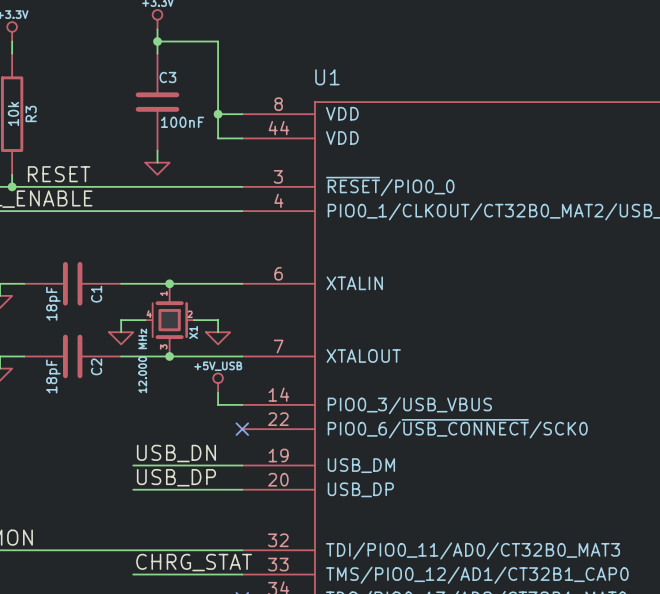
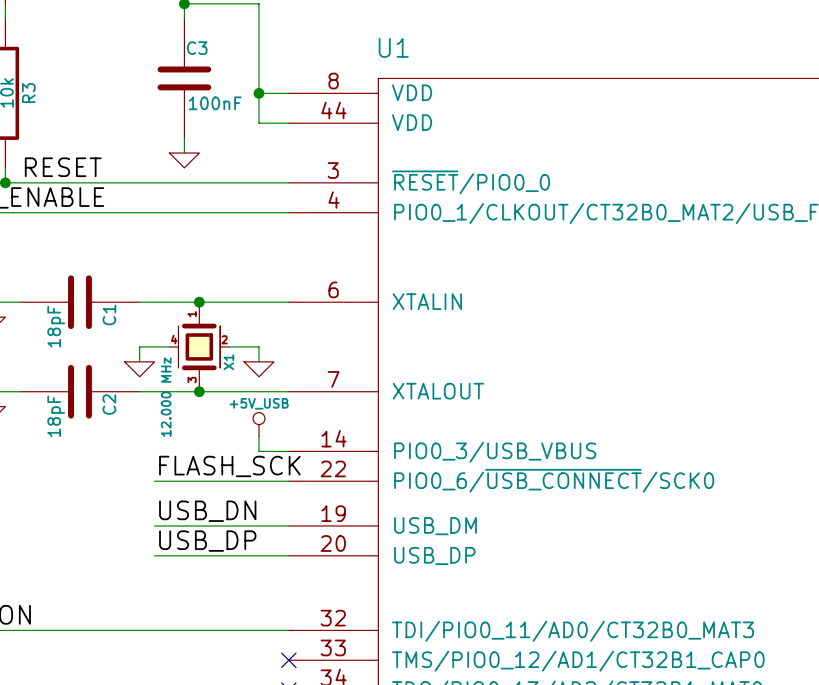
label: none -> FLASH_SCK (229, 466)
no-connect mark: (242, 429) -> none
label: CHRG_STAT (194, 562) -> none
wire: (133, 574) (242, 574) -> (154, 481) (288, 481)
no-connect mark: none -> (288, 660)

